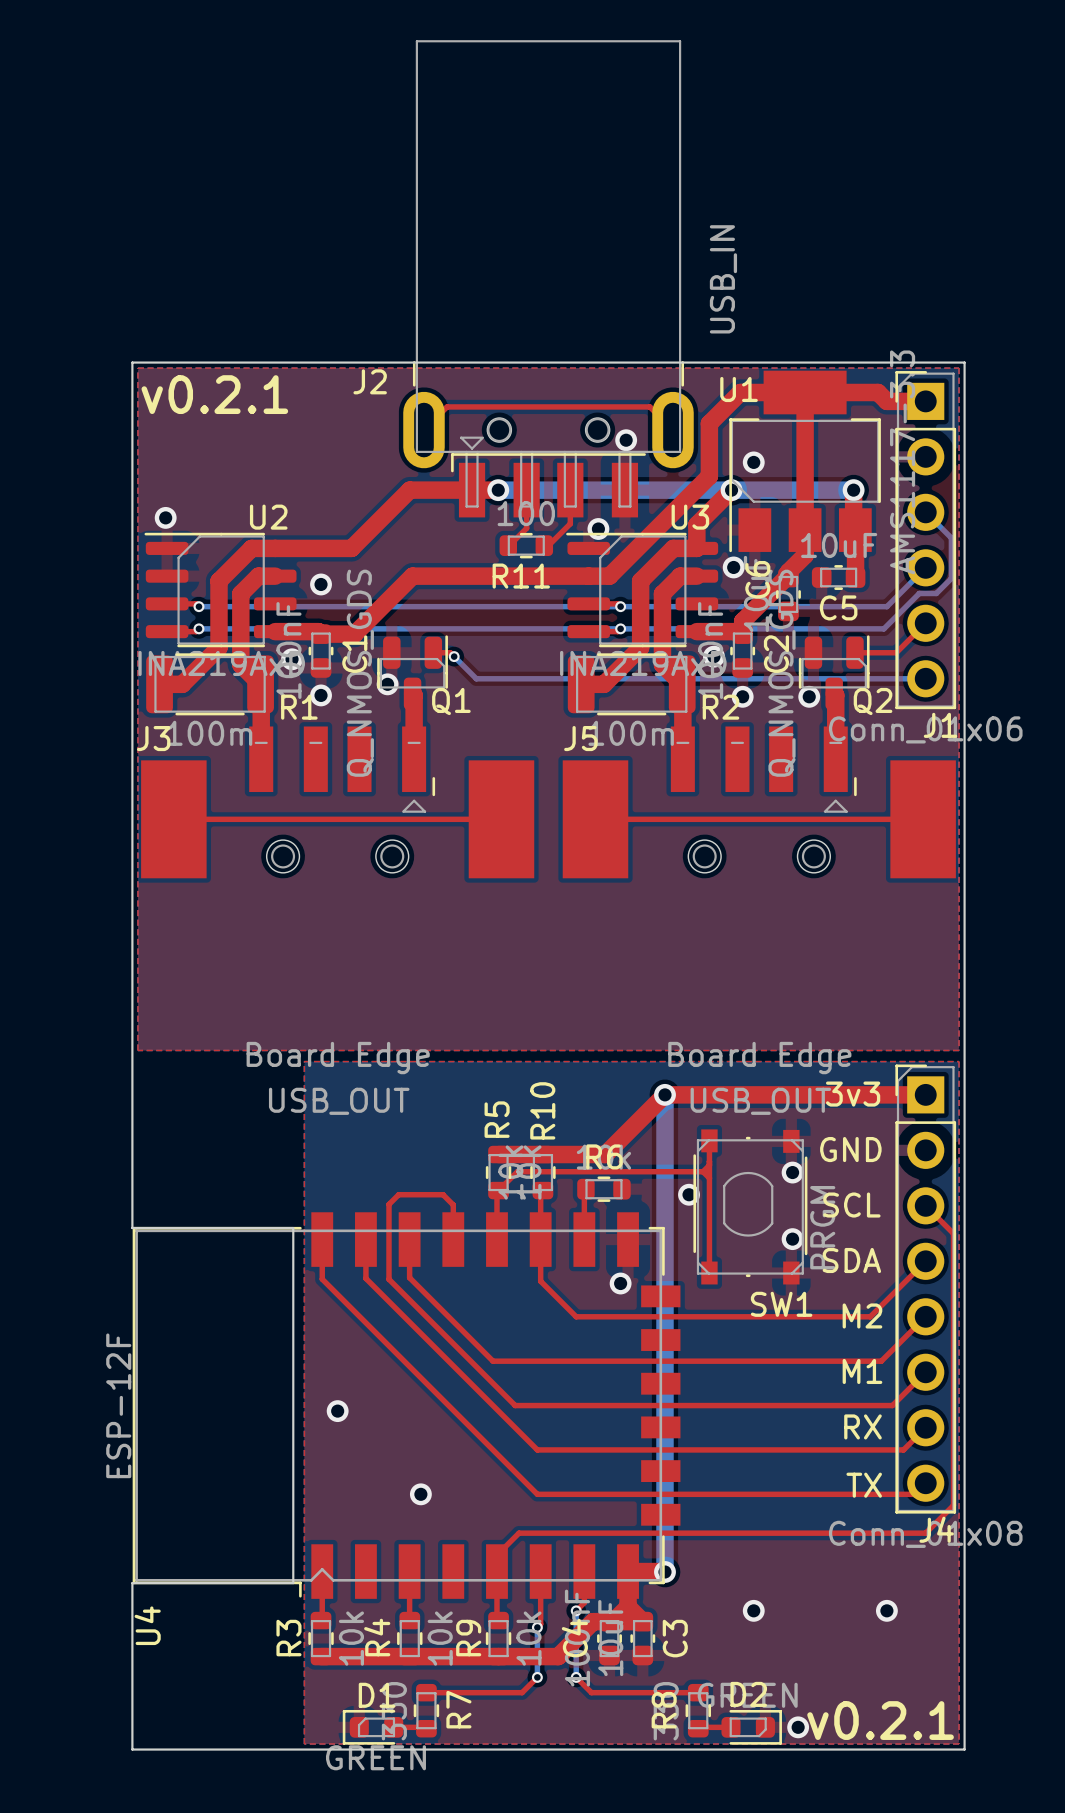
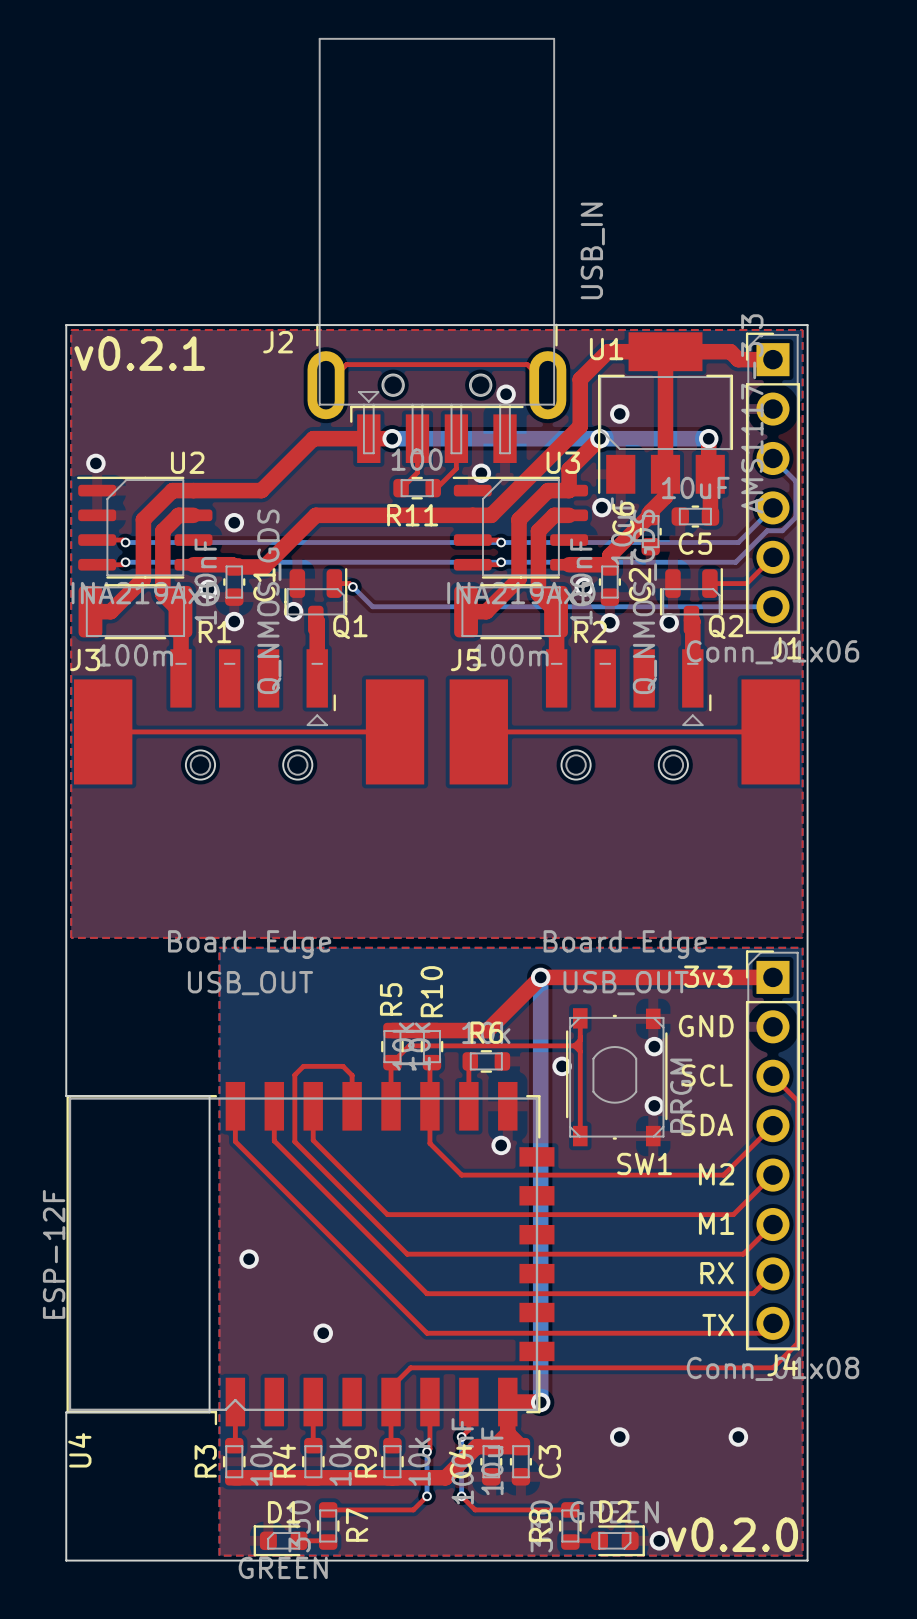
text: v0.2.1 (880, 1720) -> v0.2.0 (732, 1534)

